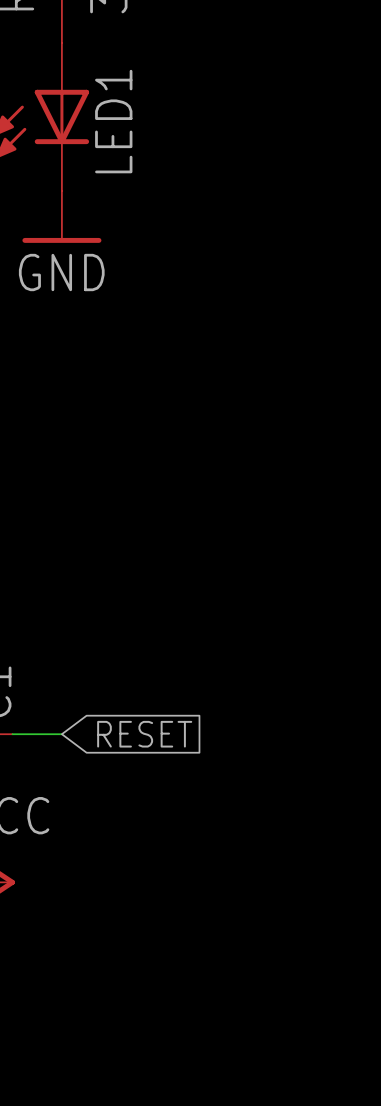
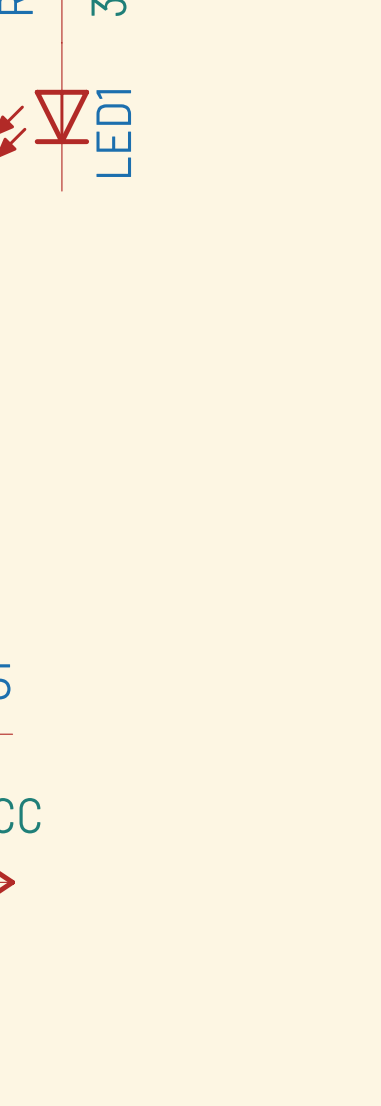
power symbol: GND (61, 216) -> none
wire: (12, 734) (61, 734) -> none
global label: RESET (144, 734) -> none

